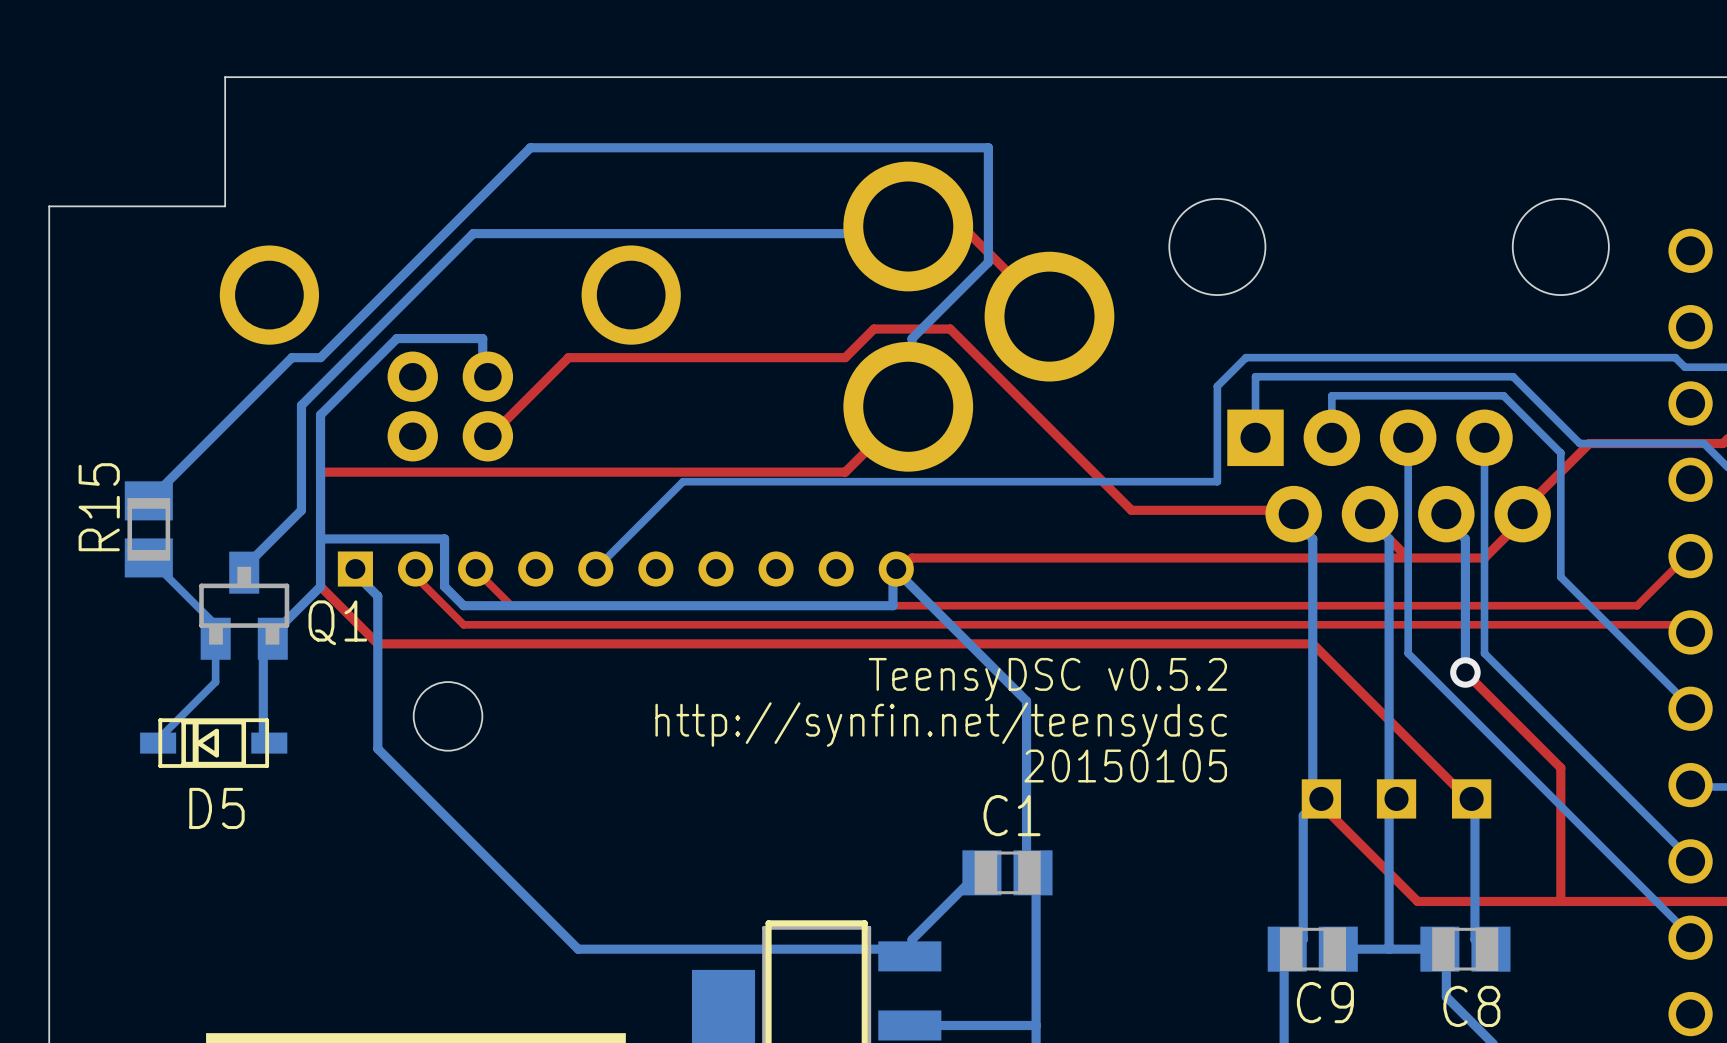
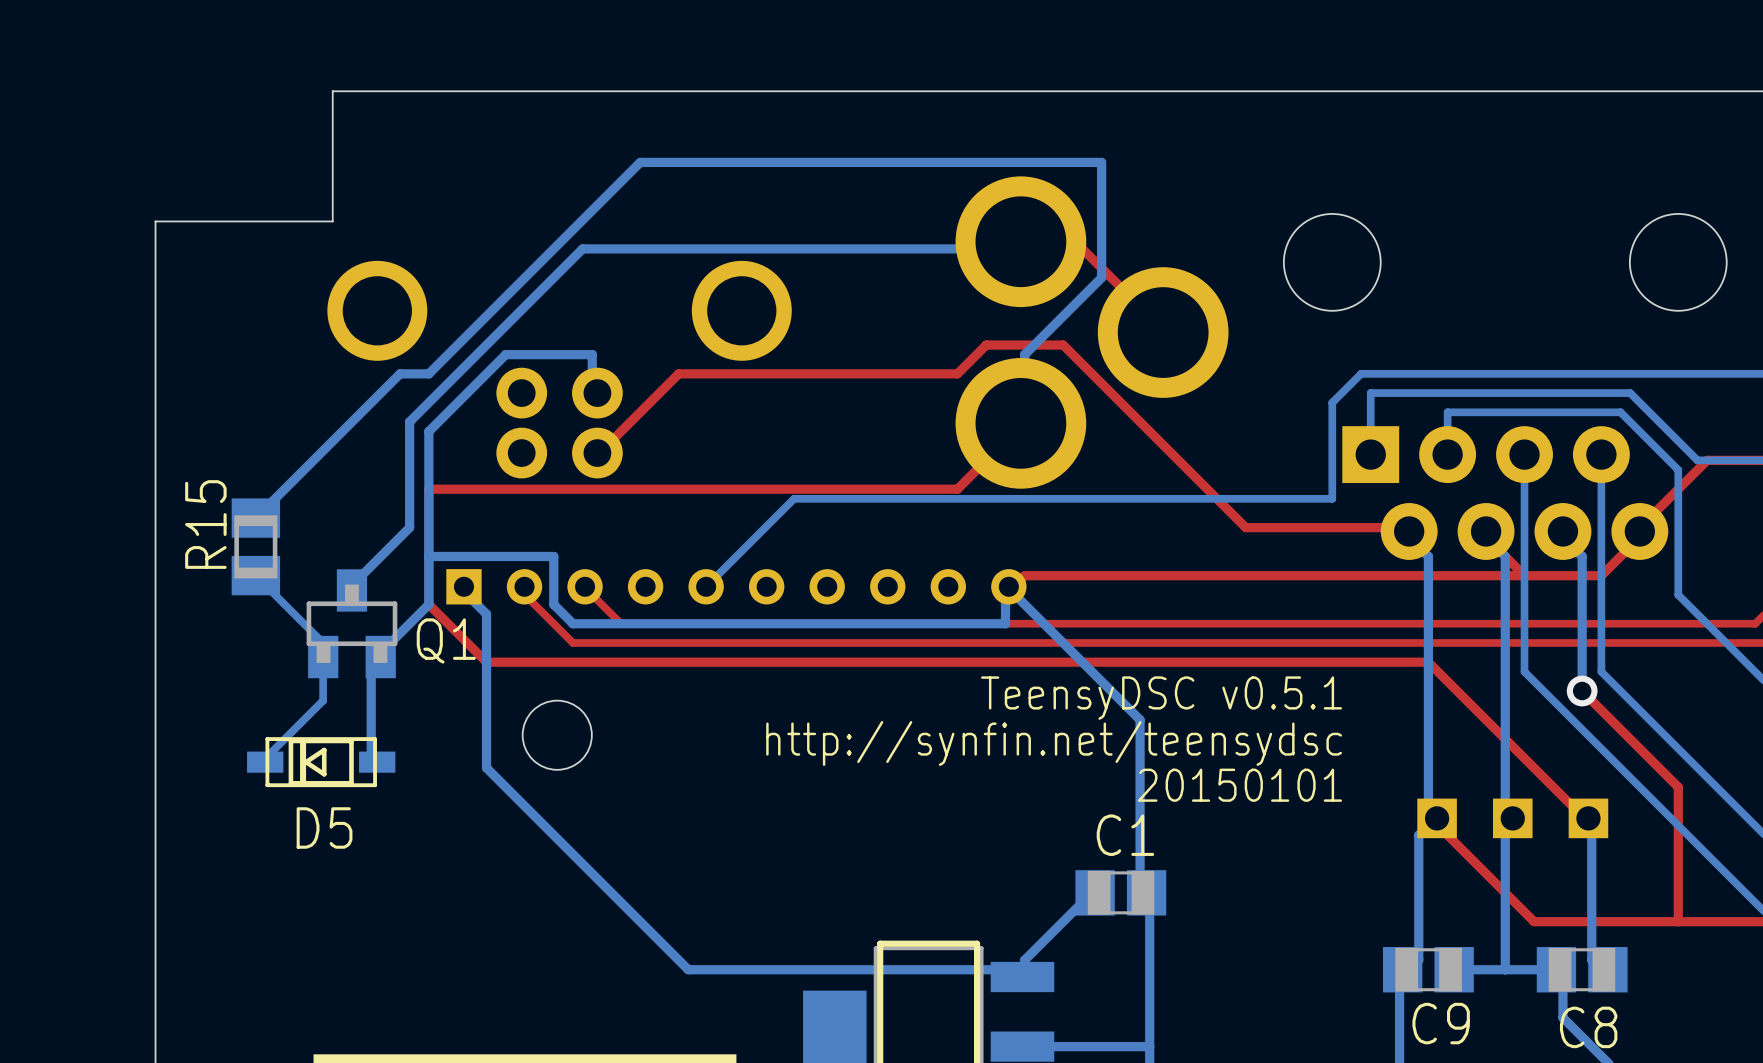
text: TeensyDSC v0.5.2 (1047, 679) -> TeensyDSC v0.5.1 (1161, 698)
text: 20150105 (1125, 765) -> 20150101 (1239, 785)

